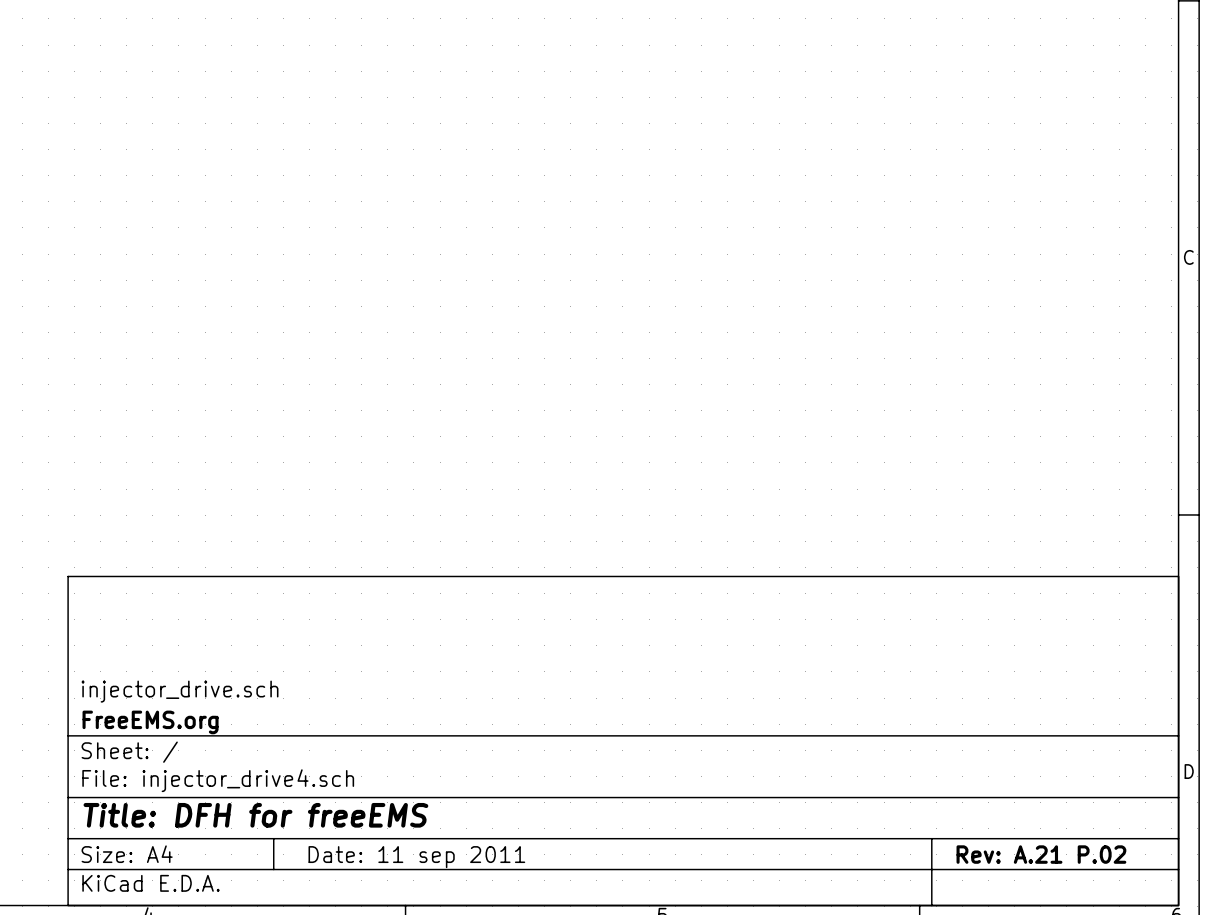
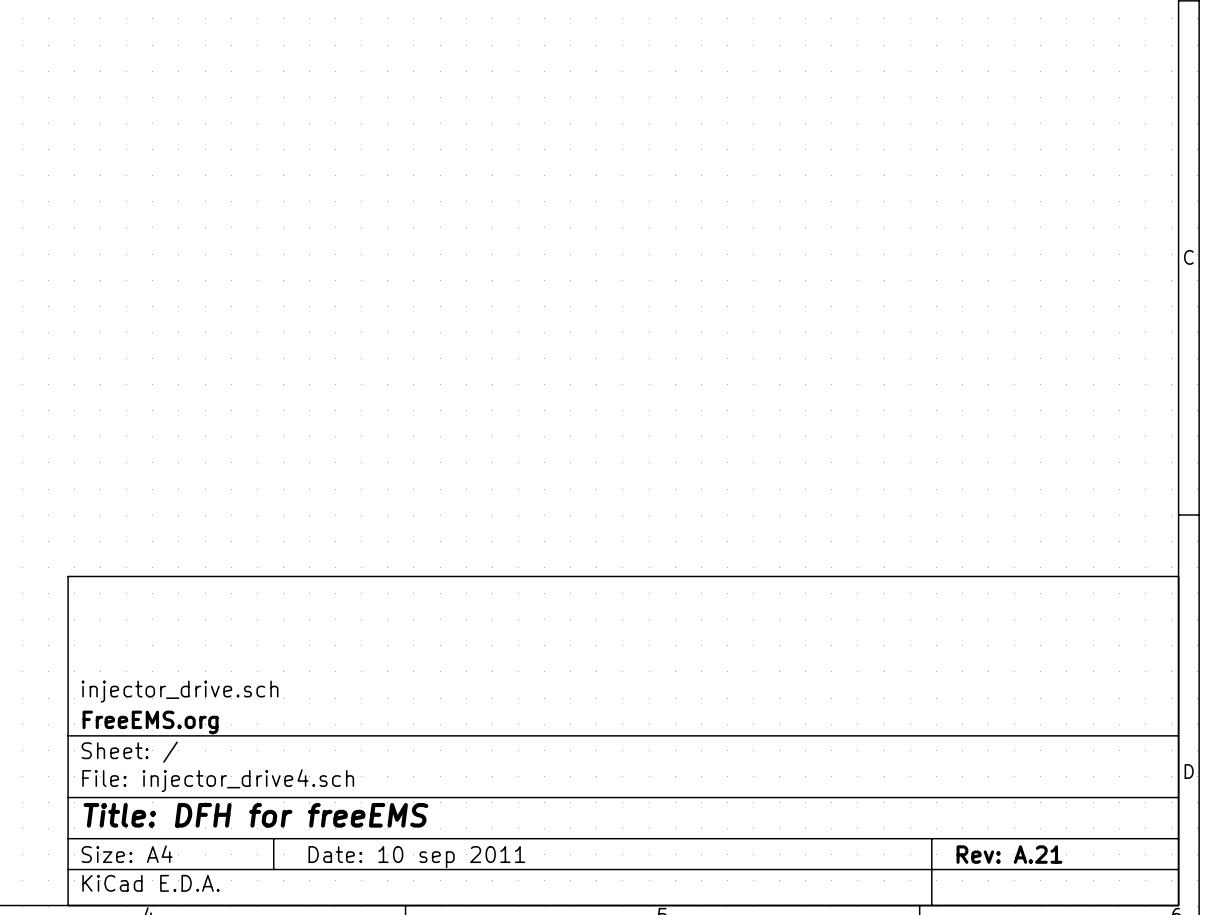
title block: Rev: A.21 P.02 (1041, 854) -> Rev: A.21 (1009, 854)
title block: Date: 11 sep 2011 (416, 857) -> Date: 10 sep 2011 (416, 857)

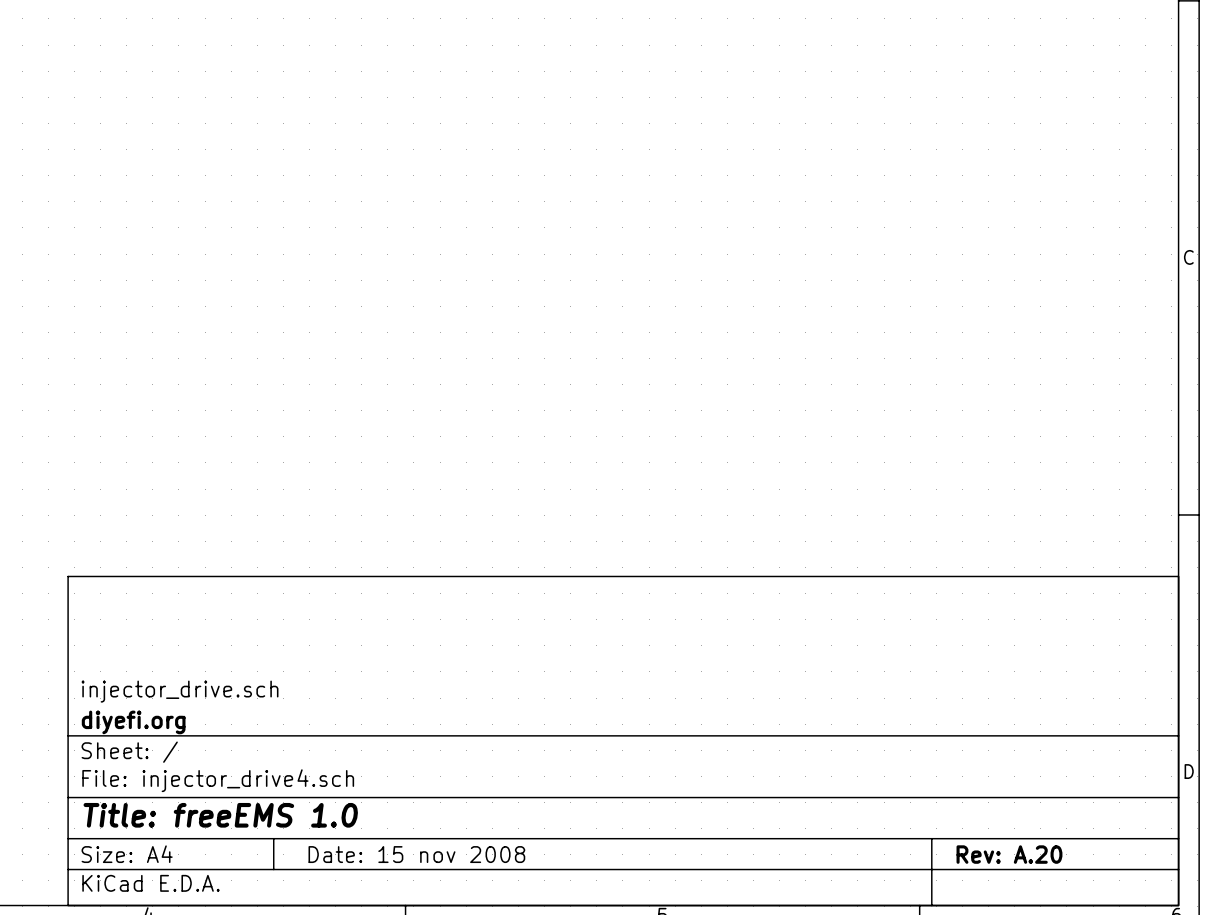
title block: FreeEMS.org (150, 722) -> diyefi.org (133, 722)
title block: Title: DFH for freeEMS (255, 815) -> Title: freeEMS 1.0 (220, 815)
title block: Rev: A.21 (1009, 854) -> Rev: A.20 (1009, 854)
title block: Date: 10 sep 2011 (416, 857) -> Date: 15 nov 2008 (416, 854)

